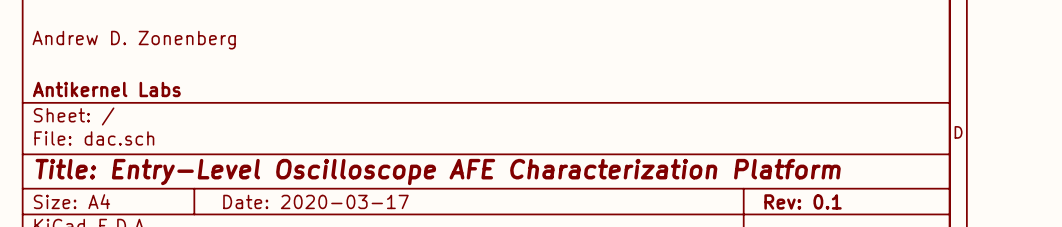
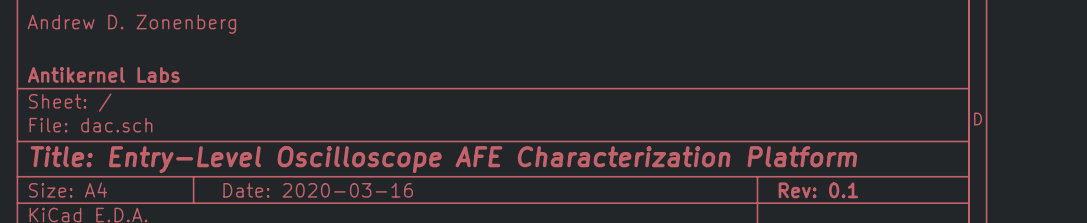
title block: Date: 2020-03-17 (315, 201) -> Date: 2020-03-16 (318, 190)

